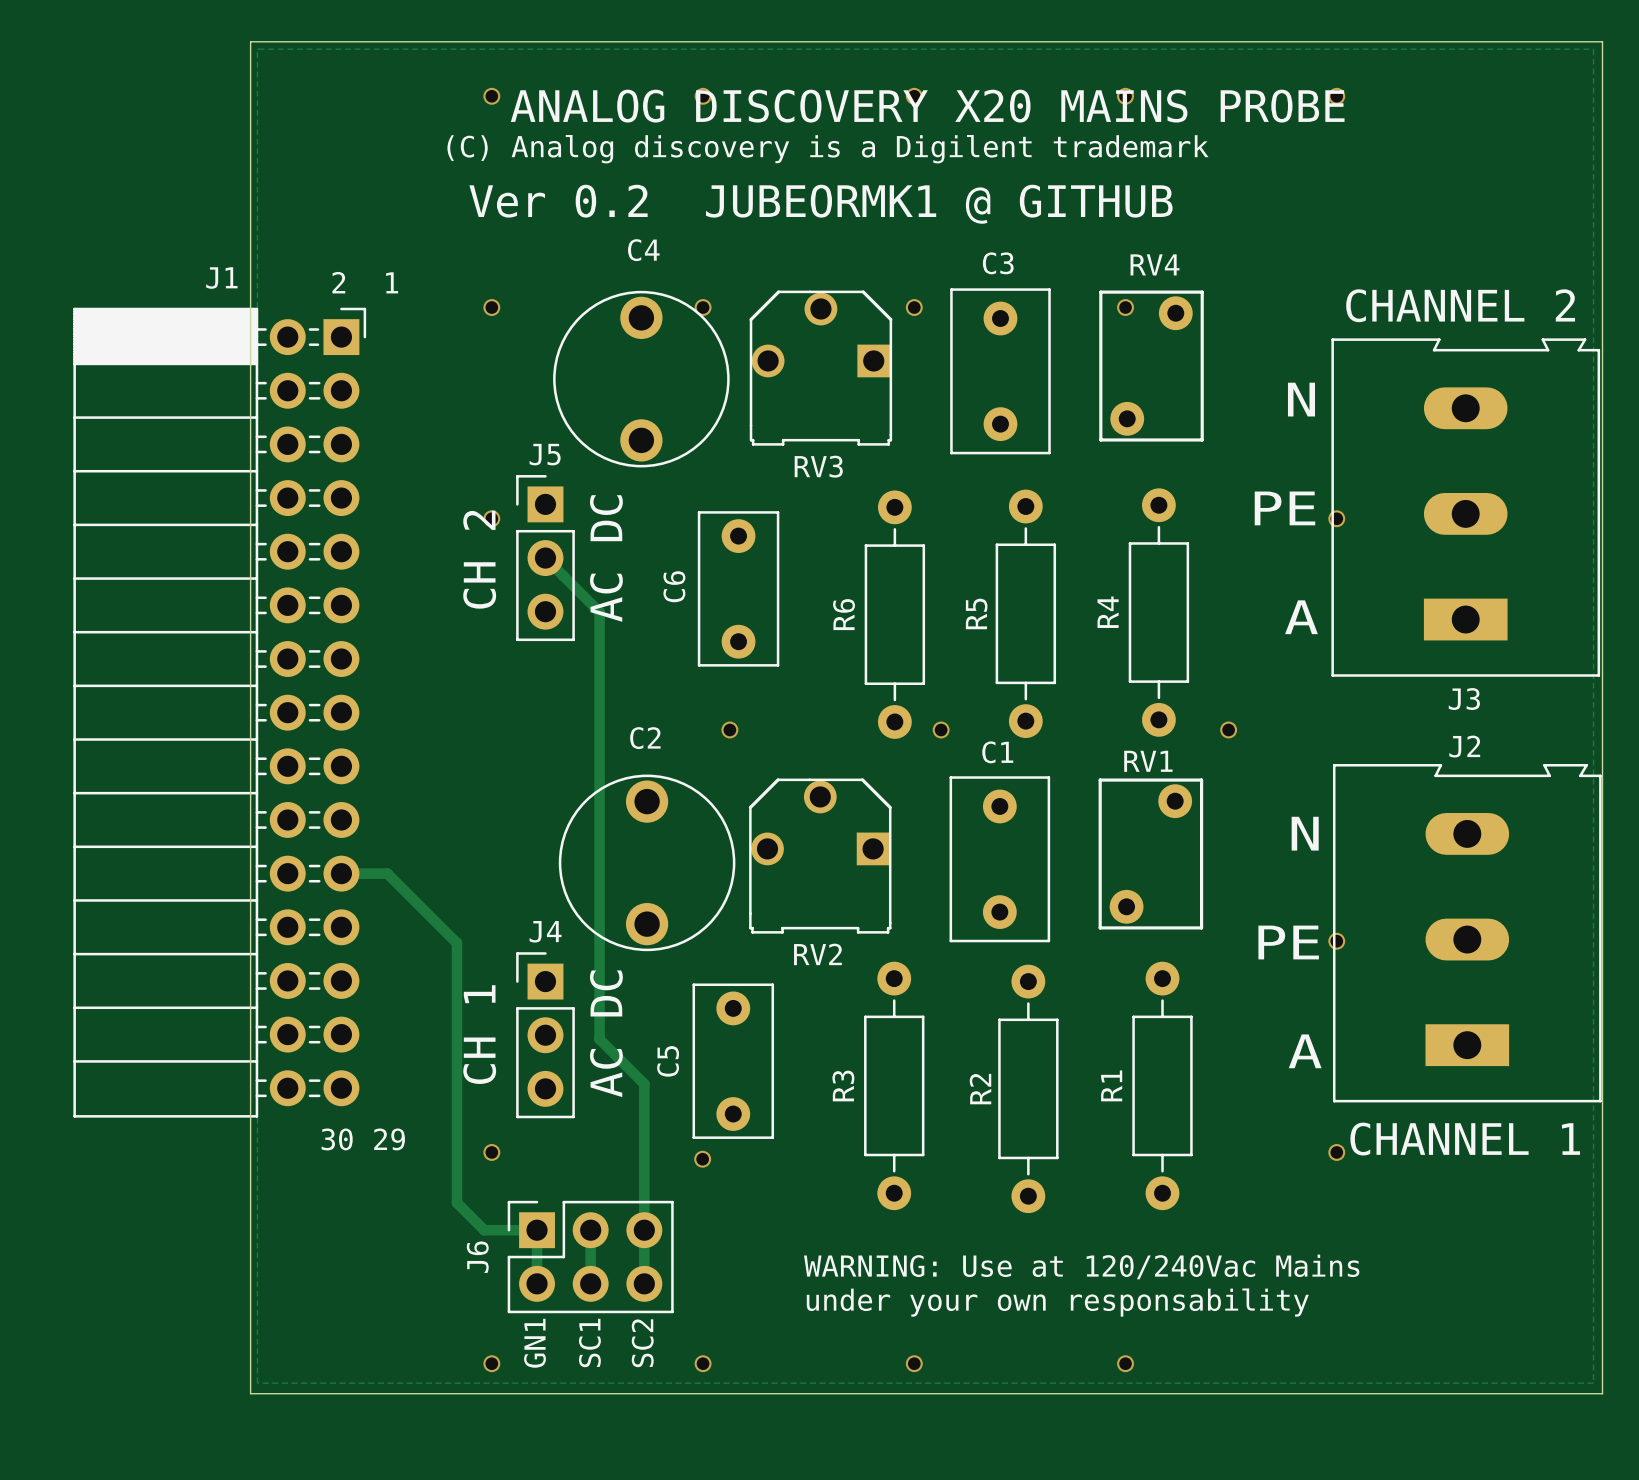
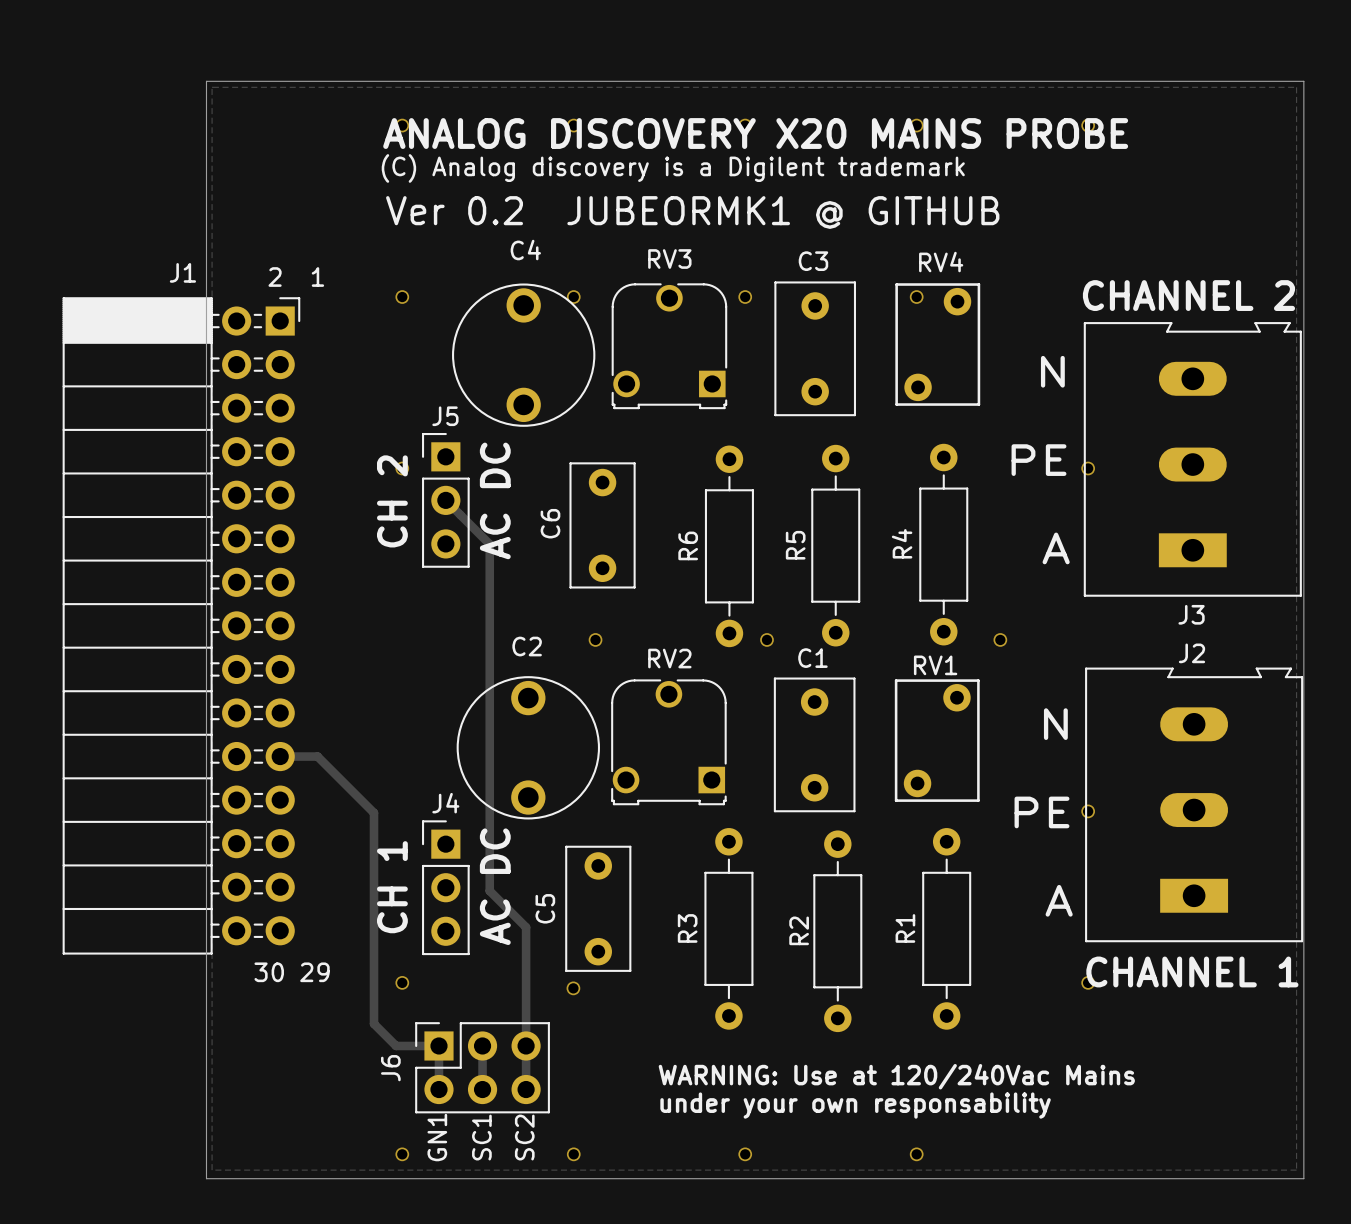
RV3 footprint: [749, 290, 893, 446] -> [611, 283, 728, 410]
RV3 name position: RV3 (818, 466) -> RV3 (669, 259)
RV2 footprint: [748, 778, 892, 934] -> [611, 679, 727, 806]
RV2 name position: RV2 (817, 954) -> RV2 (669, 658)

